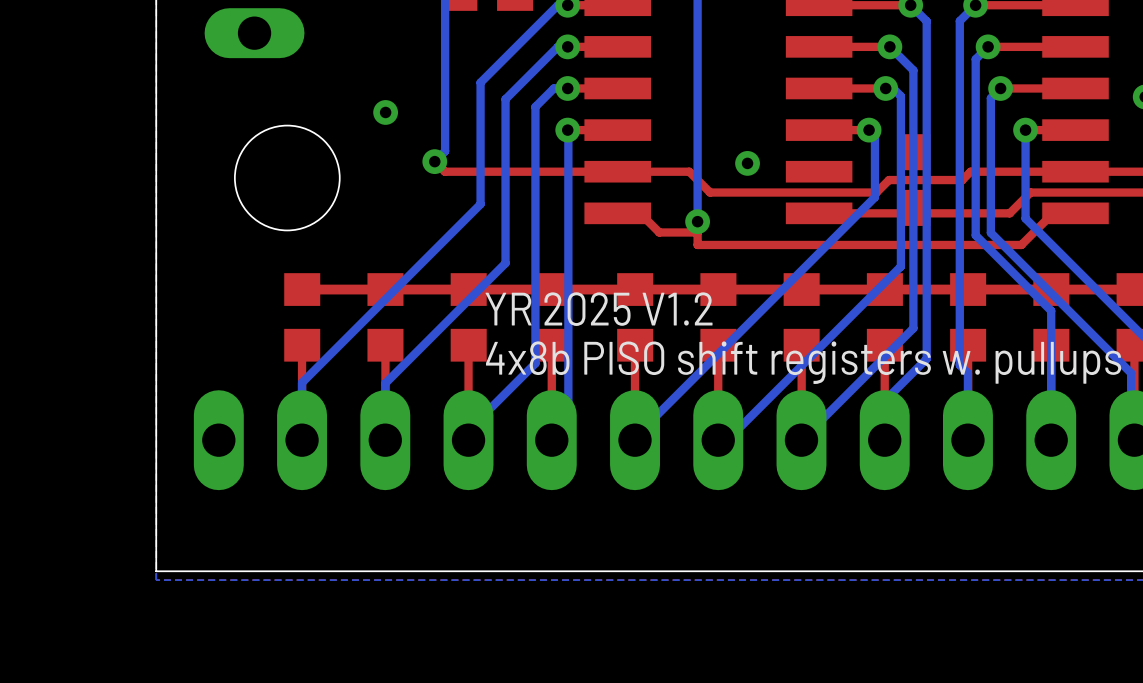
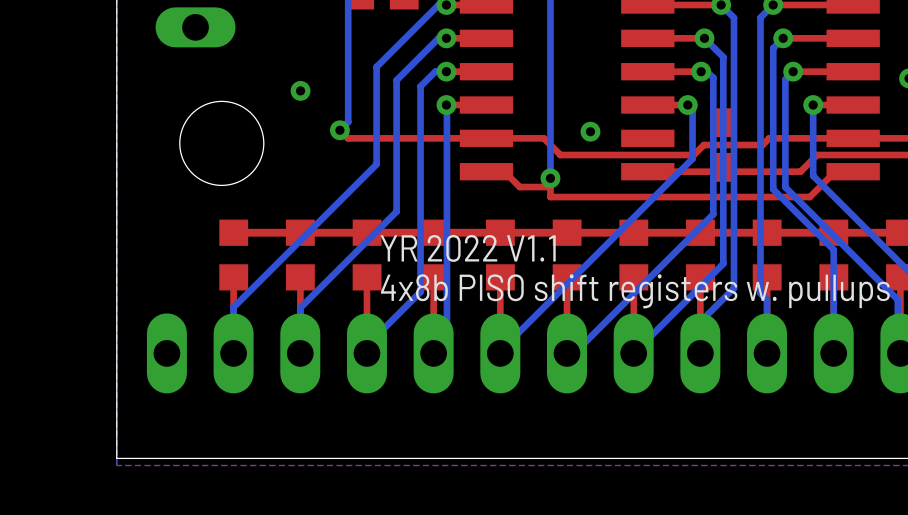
text: YR 2025 V1.2 (599, 309) -> YR 2022 V1.1 (468, 248)

